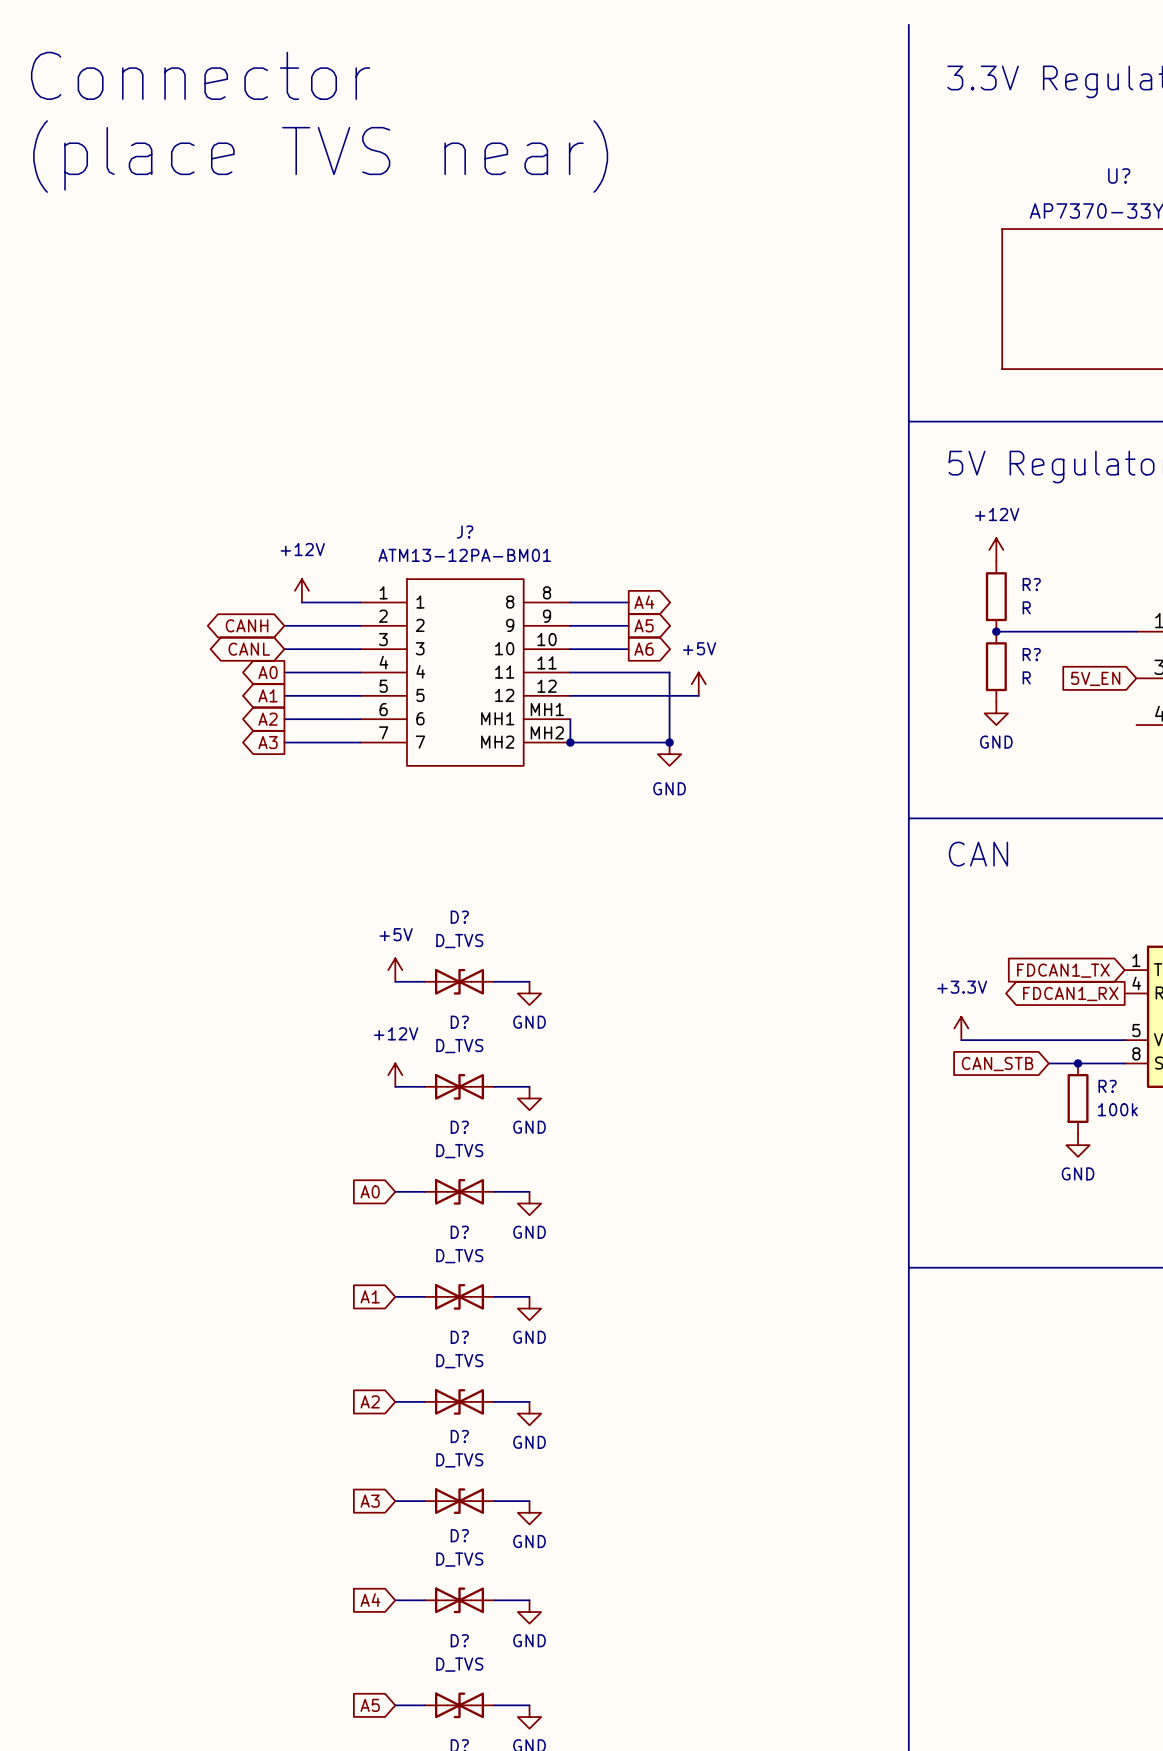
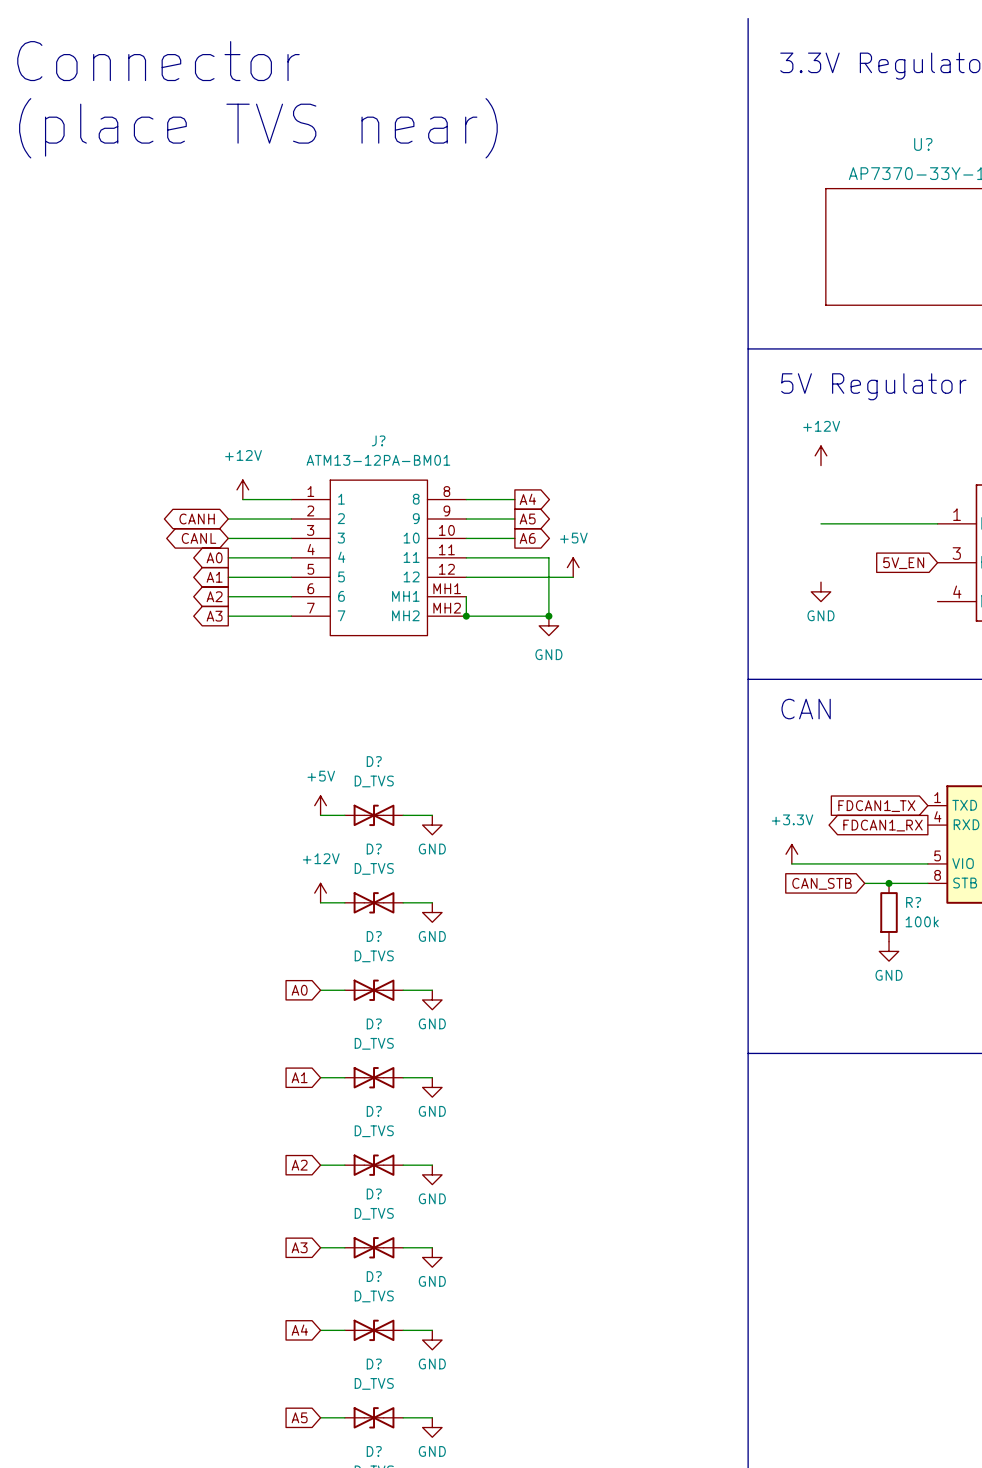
R?: R (996, 596) -> none
junction: (996, 631) -> none
R?: R (996, 666) -> none

